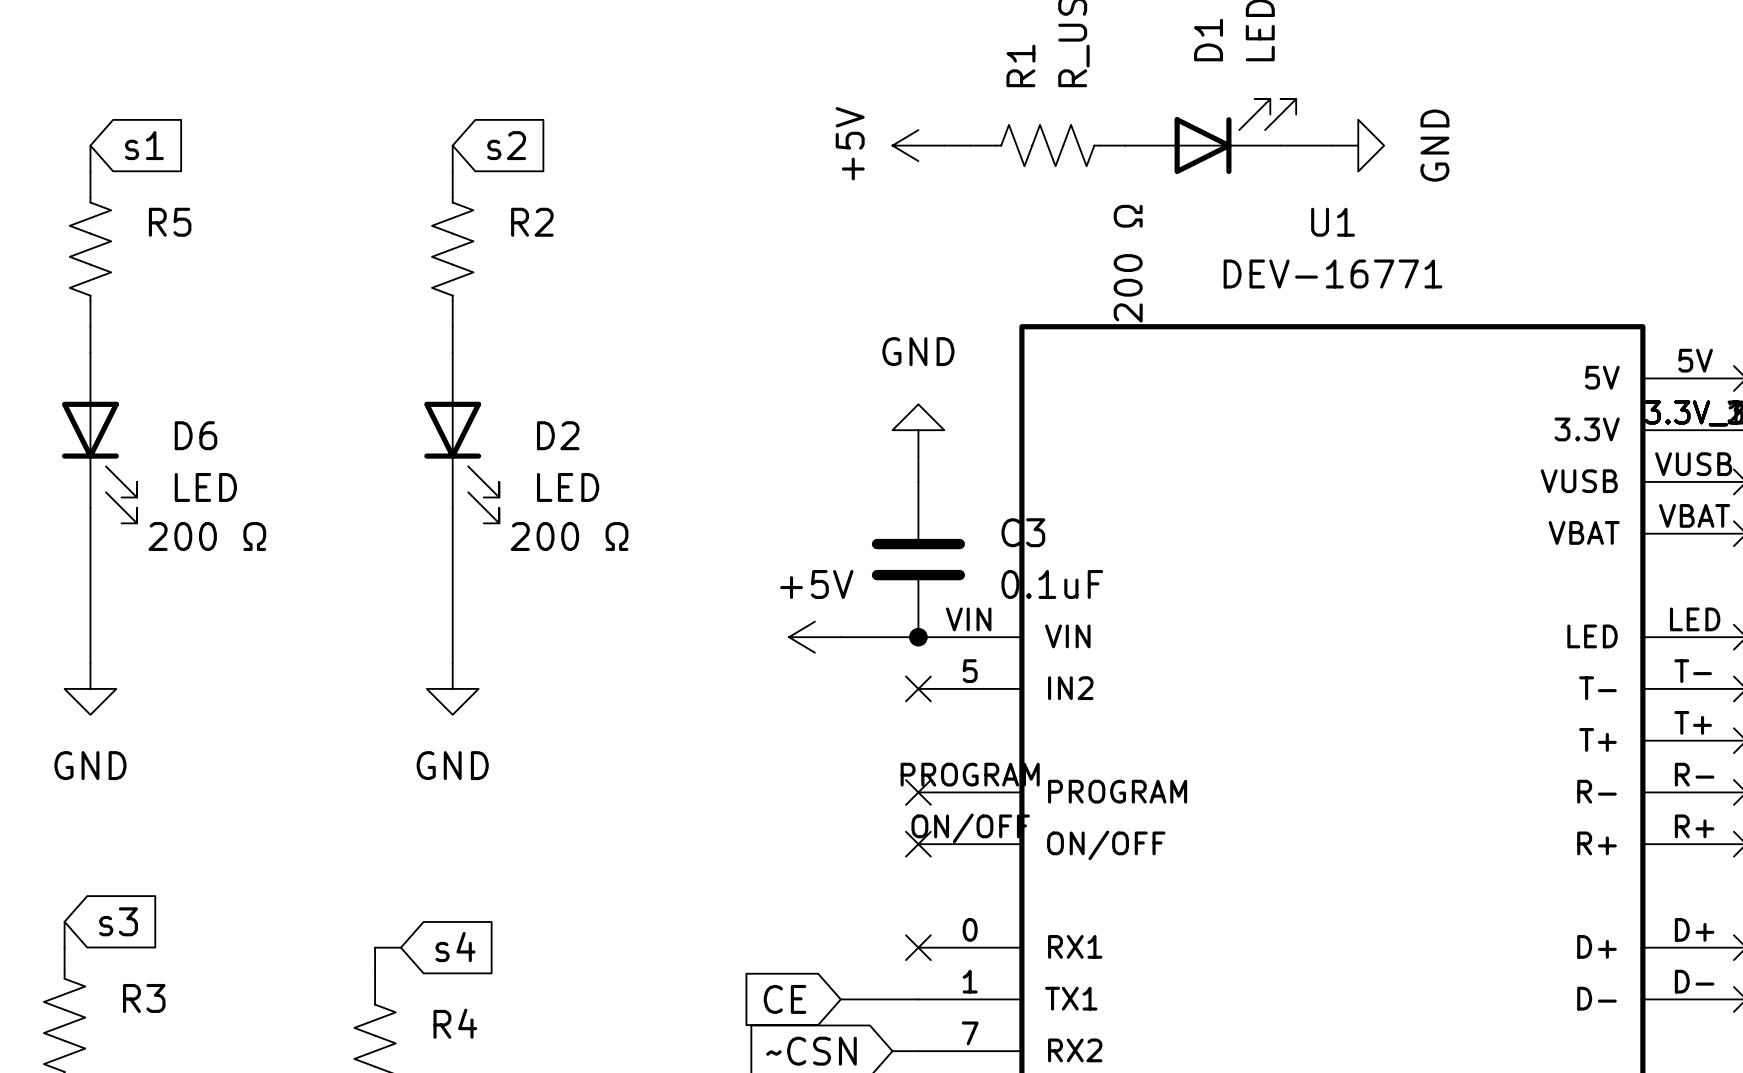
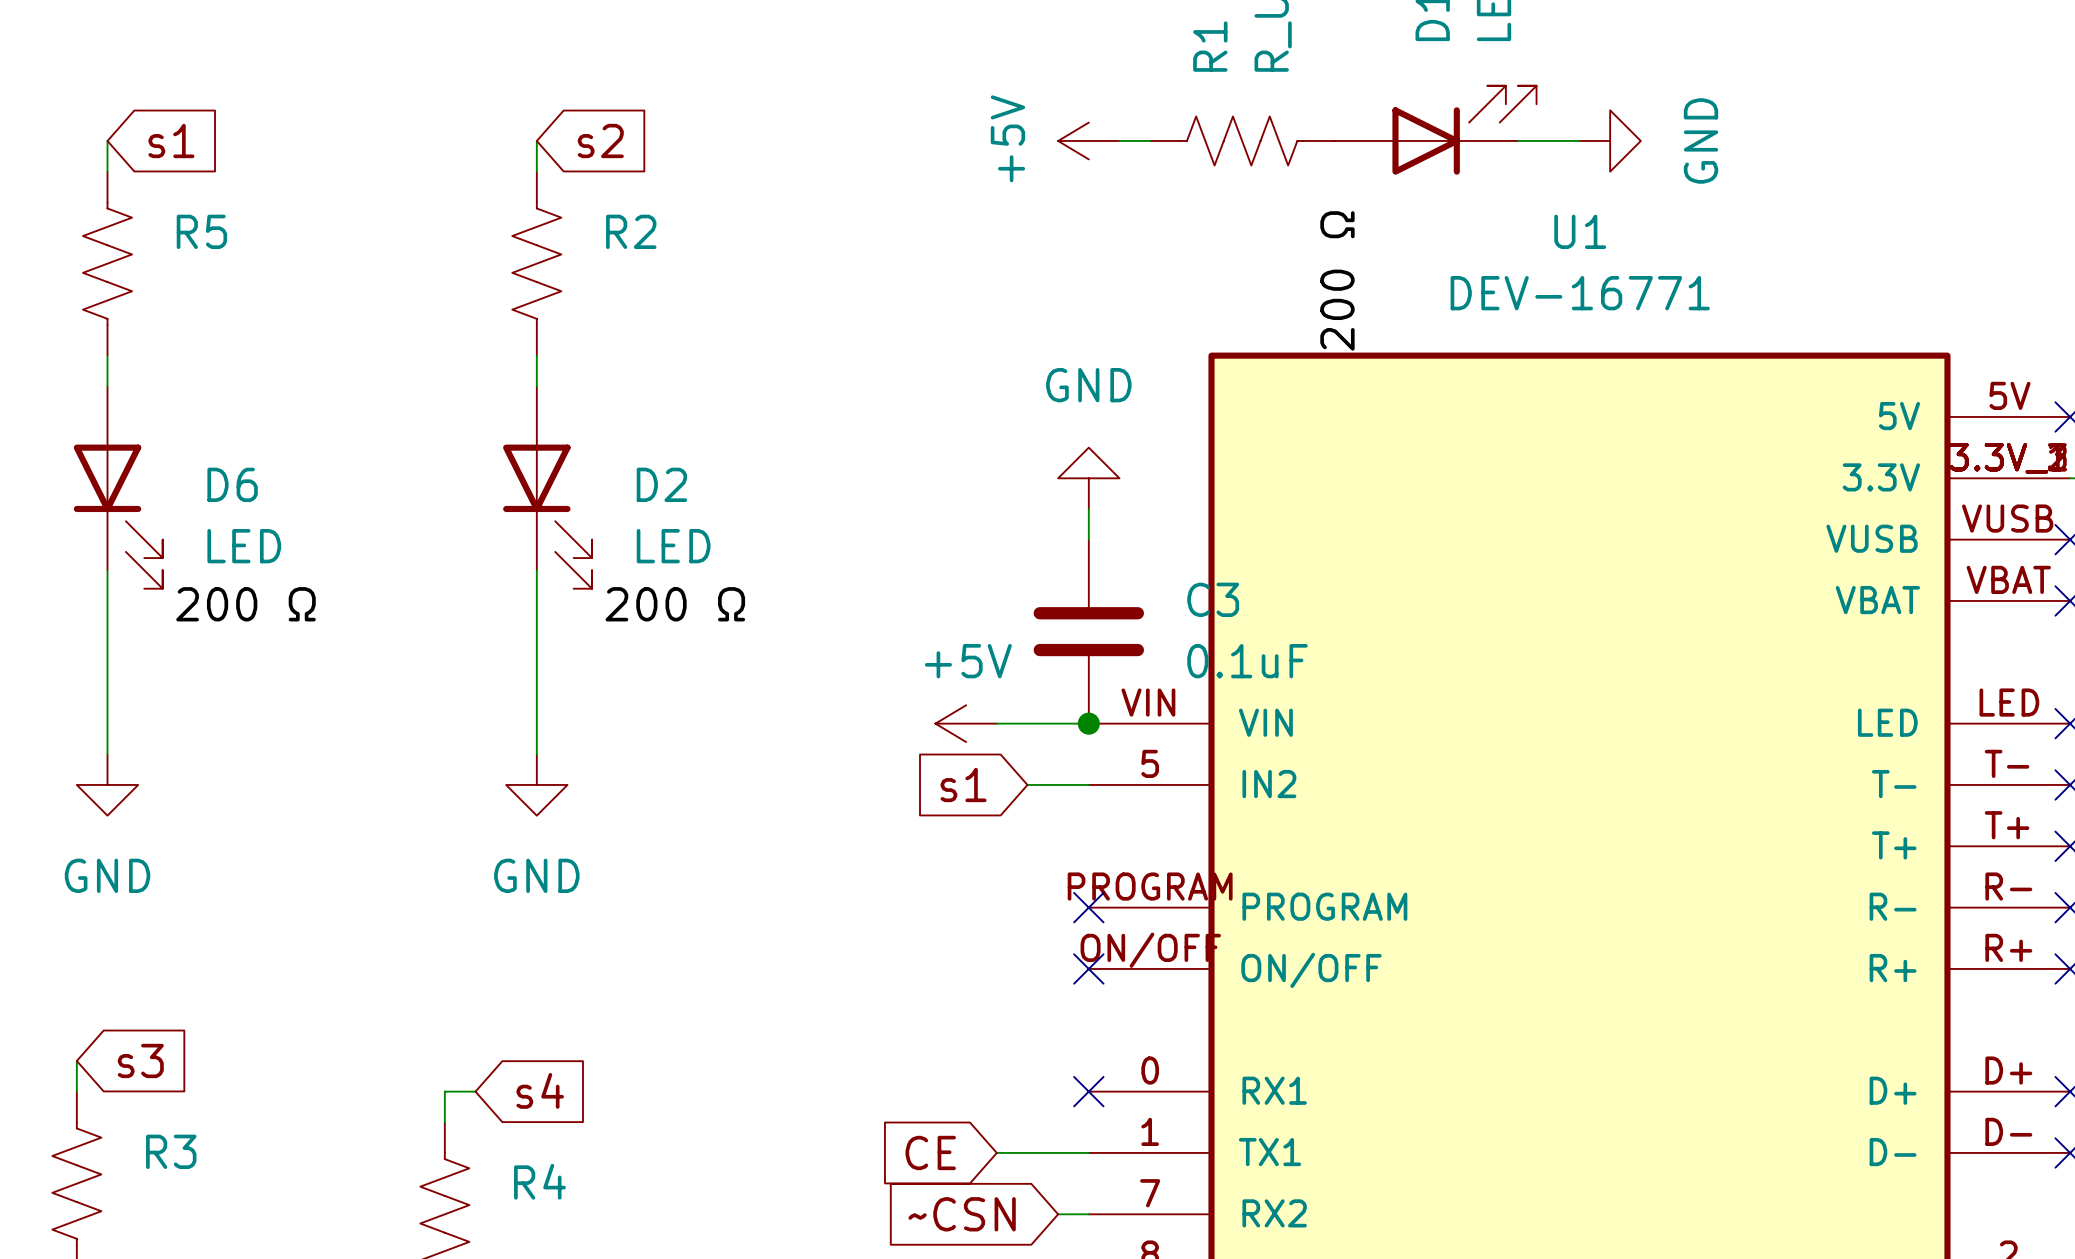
global label: none -> s1 (963, 784)
wire: none -> (1027, 784) (1088, 784)
no-connect mark: (918, 688) -> none

